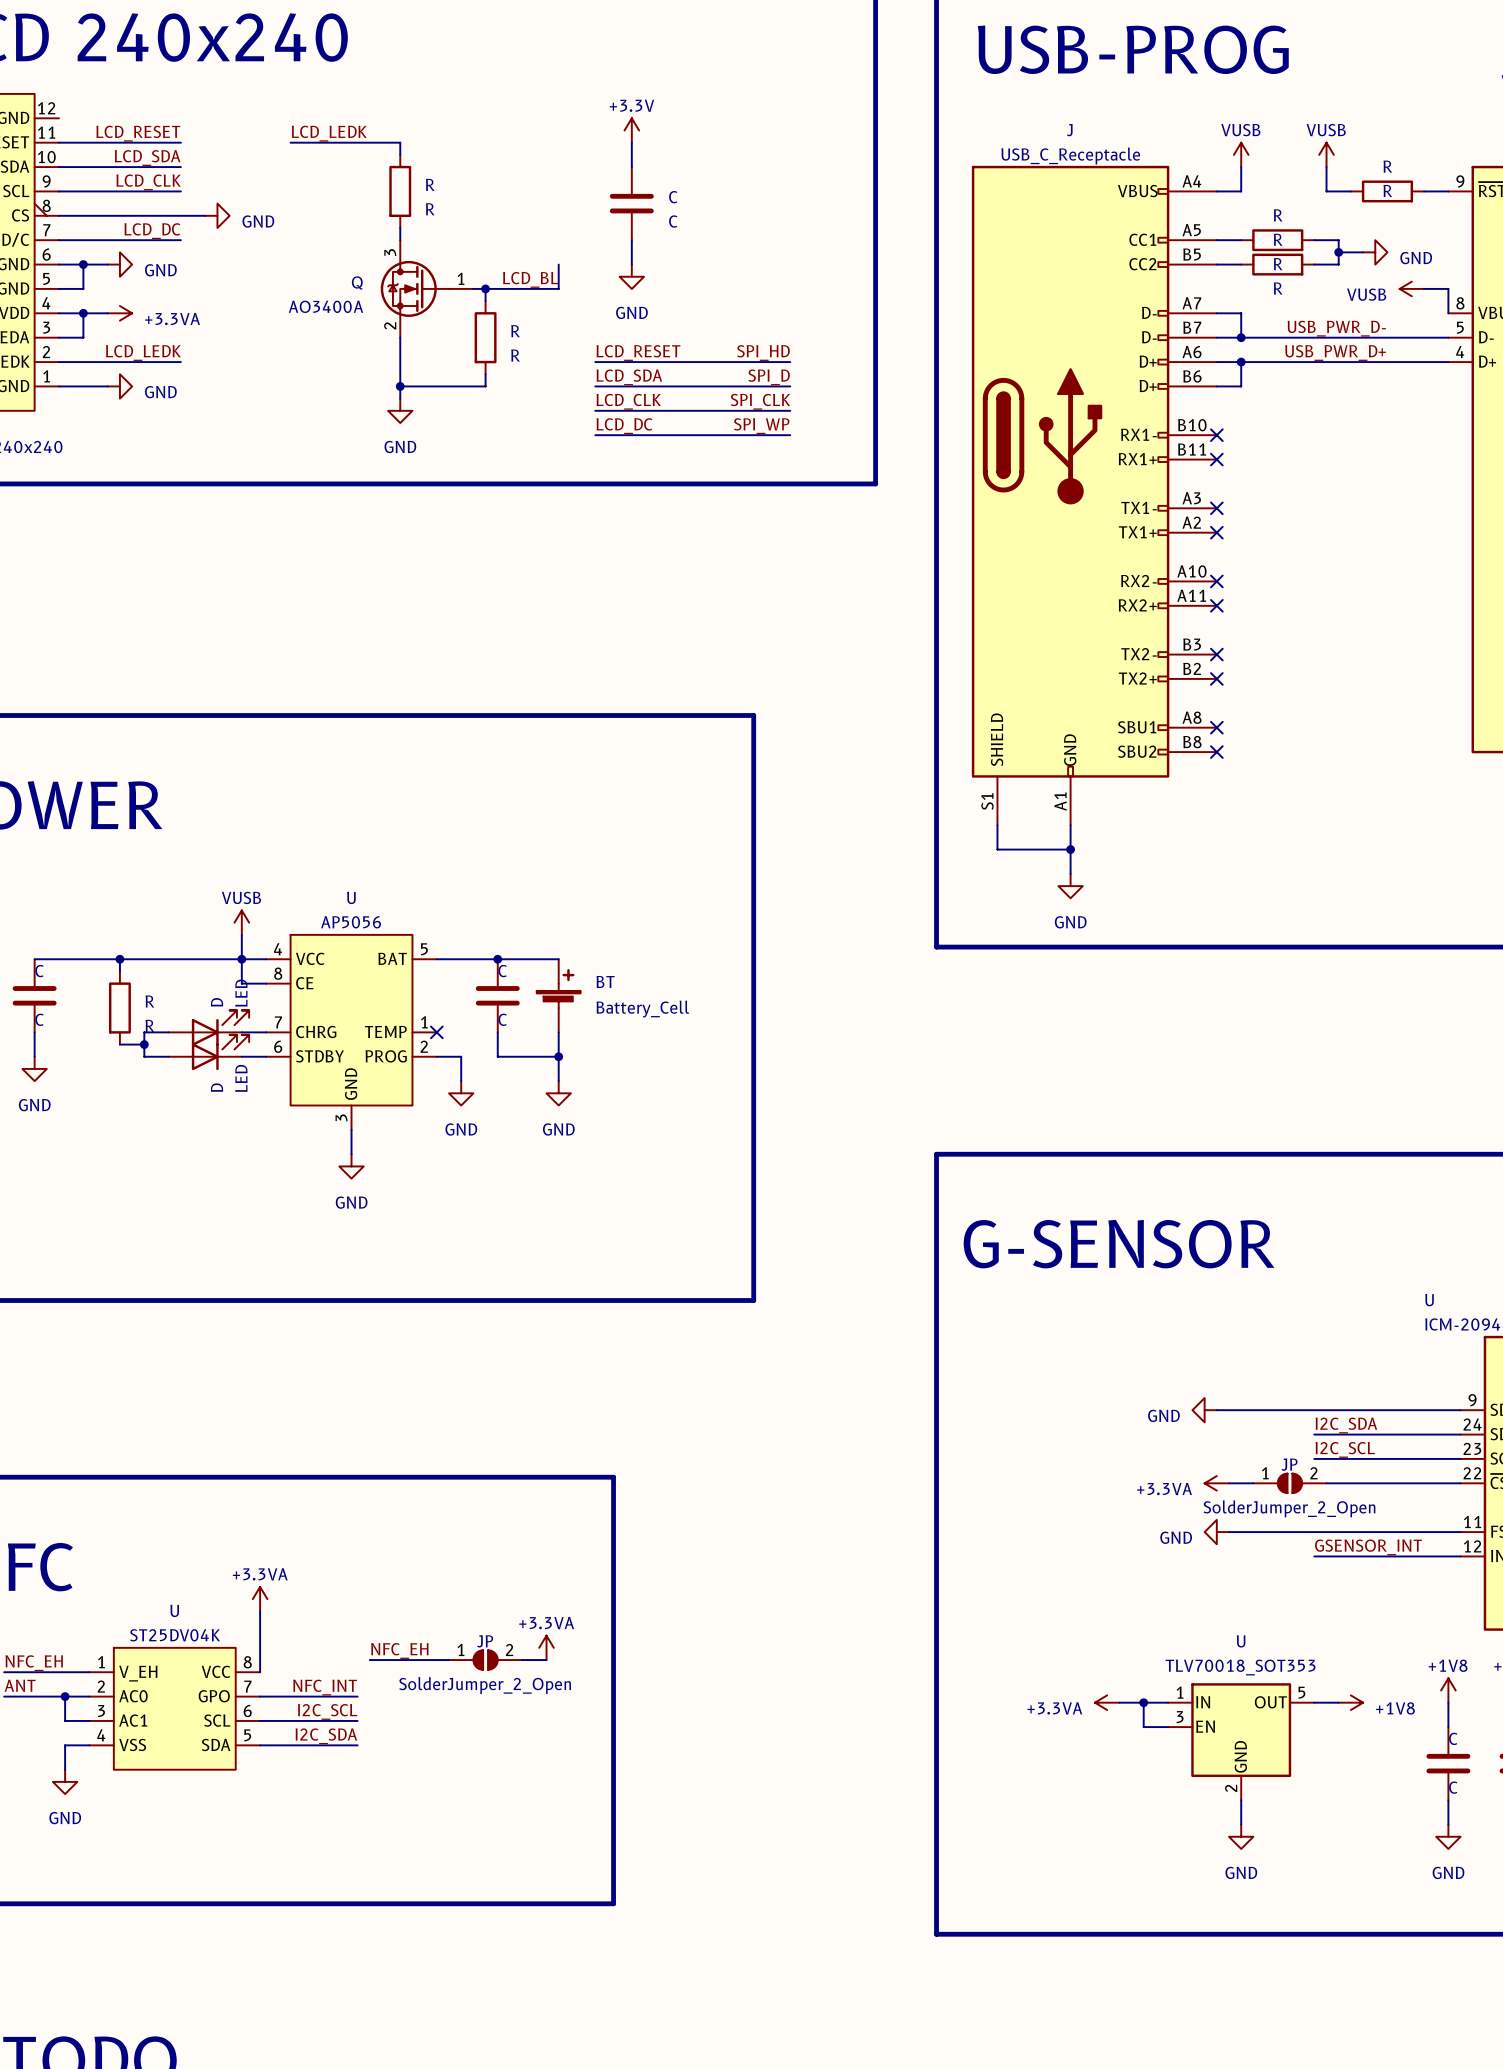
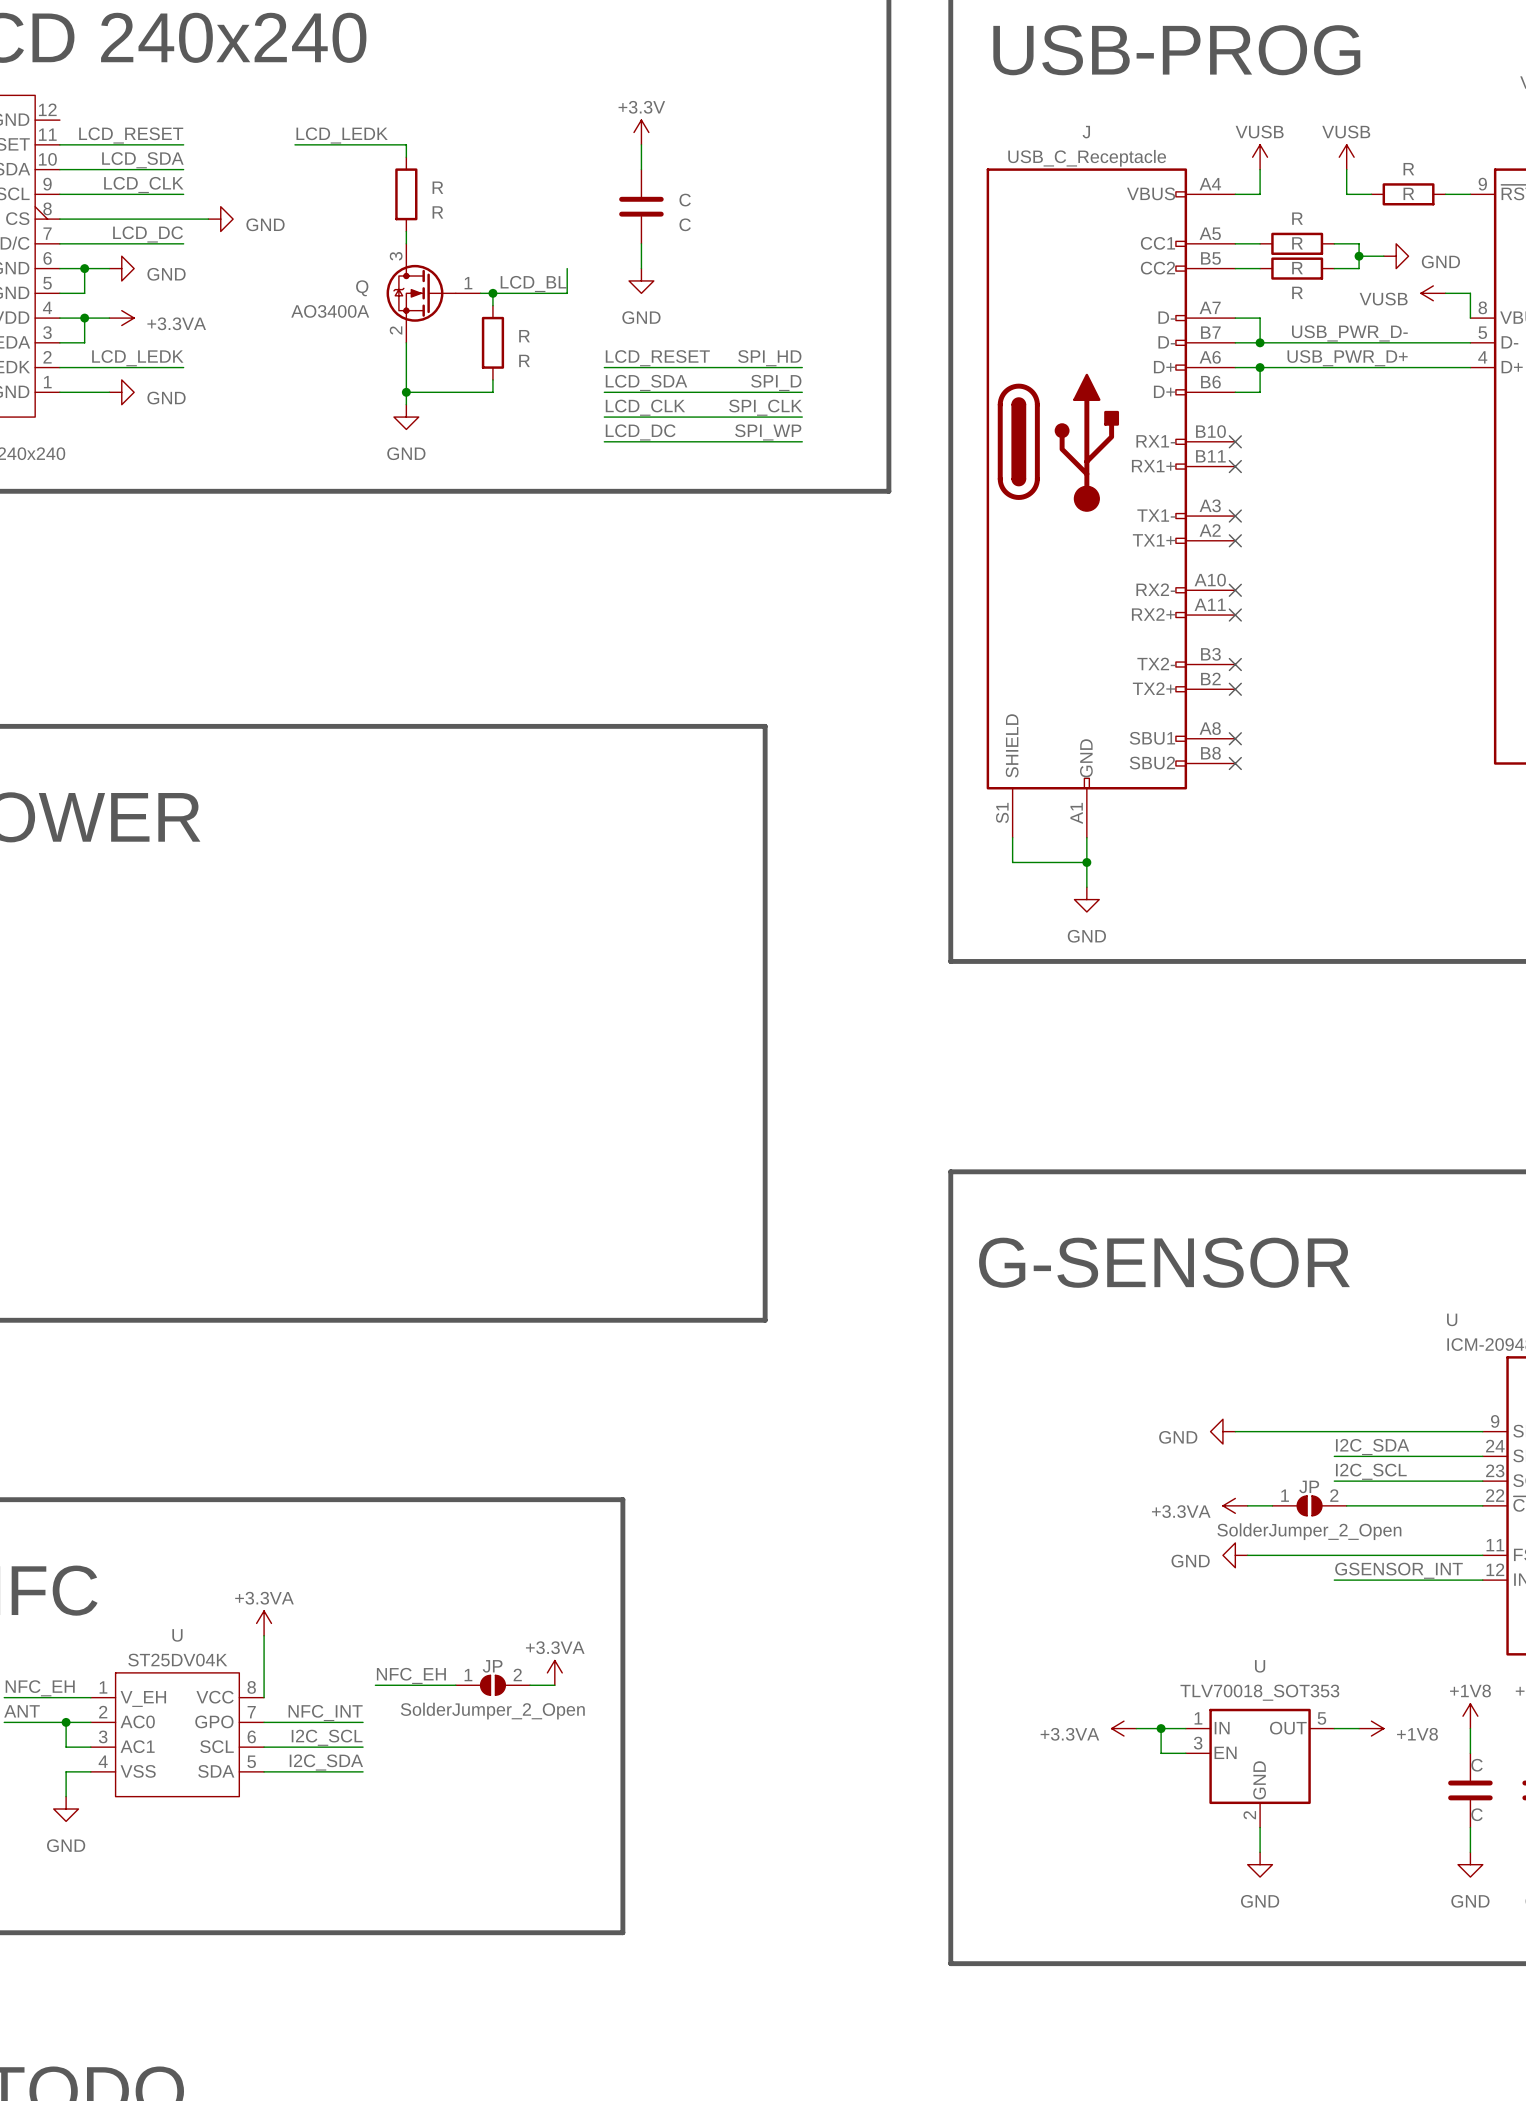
power symbol: VUSB (241, 922) -> none
wire: (241, 934) (241, 983) (266, 983) -> none
wire: (34, 959) (266, 959) -> none
wire: (119, 959) (119, 971) -> none
junction: (119, 959) -> none
junction: (241, 959) -> none
wire: (436, 959) (558, 959) -> none
junction: (497, 959) -> none
C: C (34, 995) -> none
C: C (497, 995) -> none
BT: Battery_Cell (558, 995) -> none
R: R (119, 1008) -> none
D: LED (208, 1028) -> none
wire: (34, 1032) (34, 1056) -> none
wire: (168, 1032) (144, 1032) (144, 1056) (168, 1056) -> none
wire: (241, 1032) (266, 1032) -> none
U: AP5056 (351, 1032) -> none
no-connect mark: (436, 1032) -> none
wire: (497, 1032) (497, 1056) (558, 1056) -> none
wire: (558, 1032) (558, 1081) -> none
wire: (119, 1044) (144, 1044) -> none
junction: (144, 1044) -> none
D: LED (208, 1052) -> none
wire: (241, 1056) (266, 1056) -> none
wire: (436, 1056) (461, 1056) (461, 1081) -> none
junction: (558, 1056) -> none
power symbol: GND (34, 1068) -> none
power symbol: GND (461, 1093) -> none
power symbol: GND (558, 1093) -> none
wire: (351, 1129) (351, 1154) -> none
power symbol: GND (351, 1166) -> none

